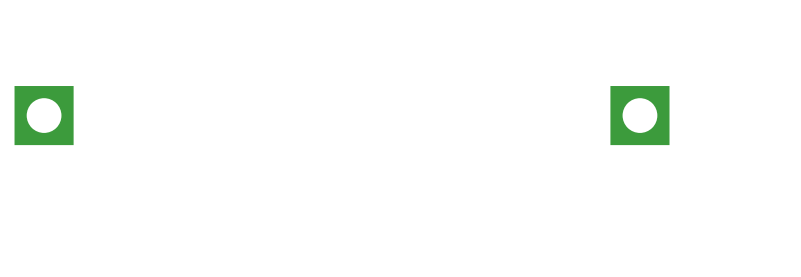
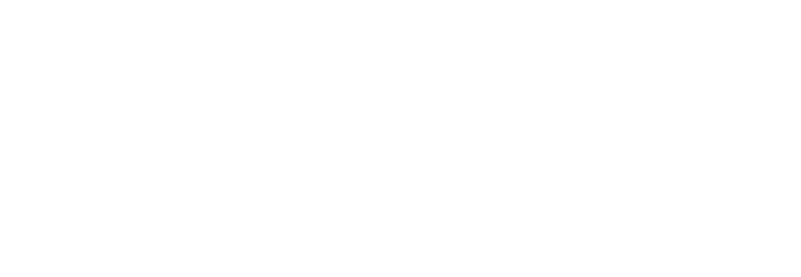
part: (44, 115) -> none
part: (639, 115) -> none

